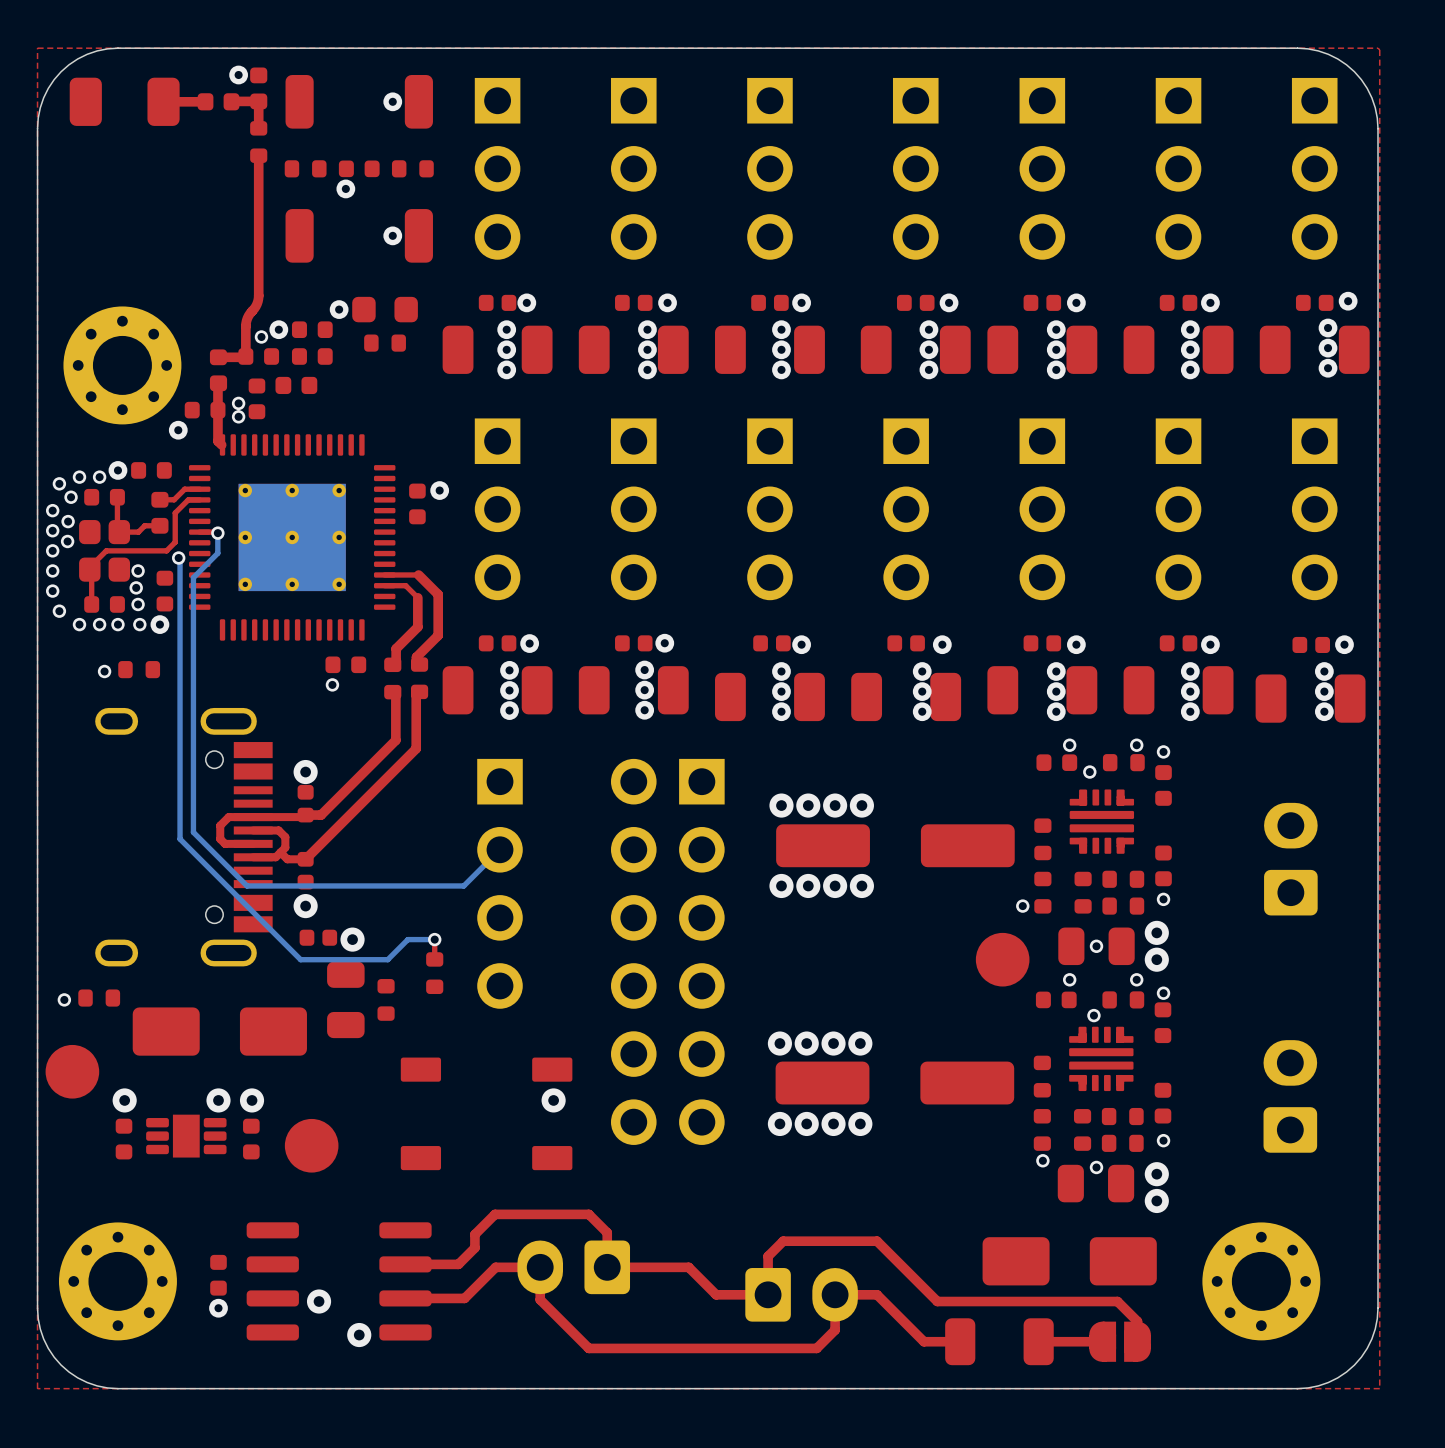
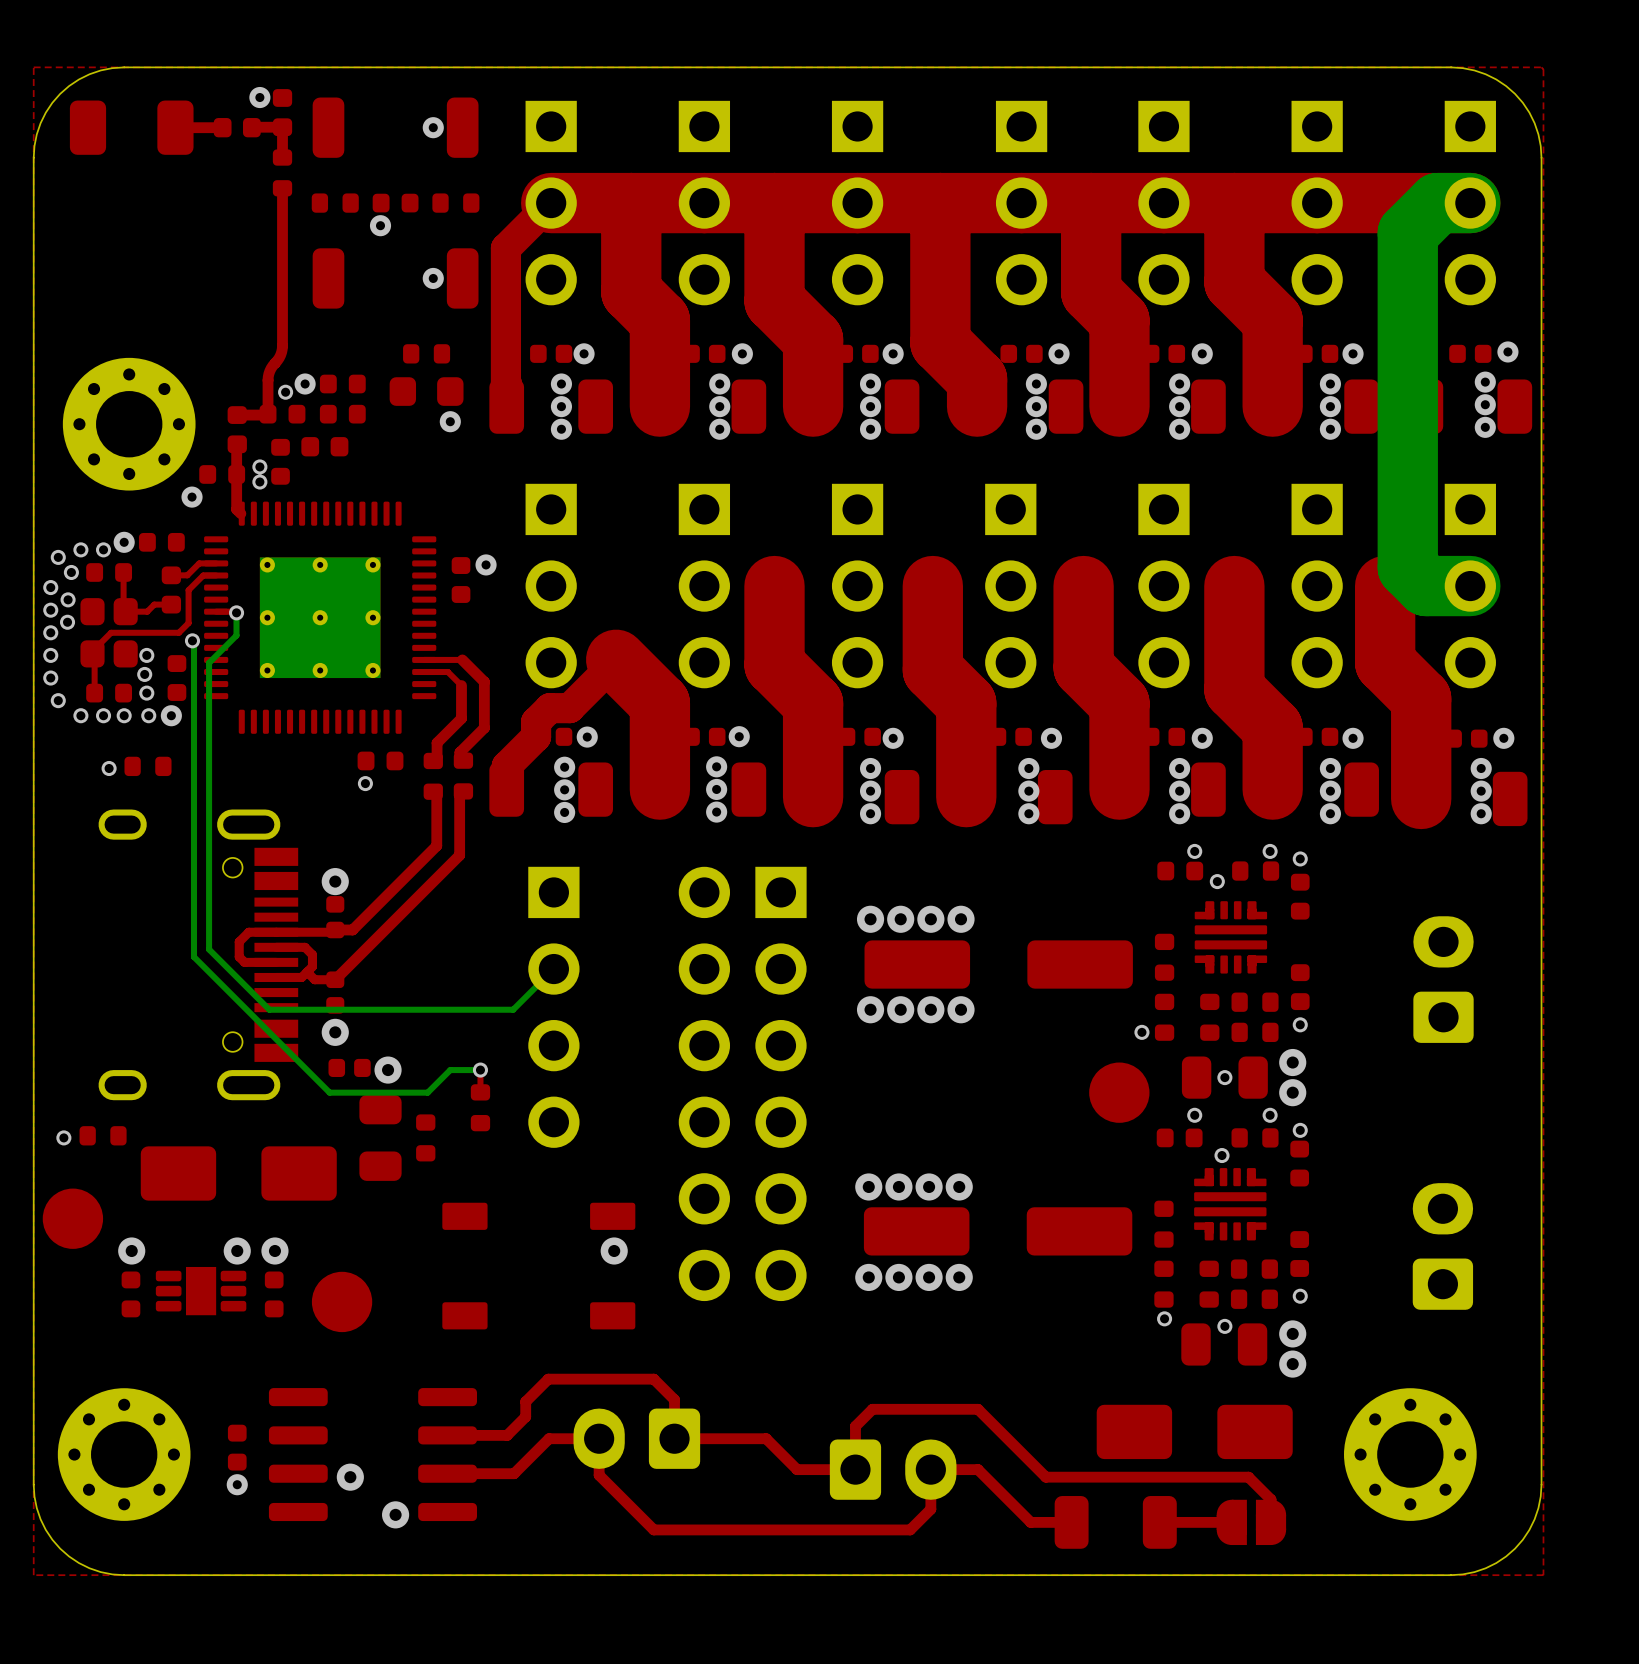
top track: none -> (631, 203) (631, 291) (659, 320) (659, 406)
top track: none -> (774, 203) (774, 301) (813, 339) (813, 406)
top track: none -> (940, 203) (940, 342) (977, 379) (977, 406)
top track: none -> (1091, 203) (1091, 292) (1119, 320) (1119, 406)
top track: none -> (1234, 203) (1234, 282) (1272, 320) (1272, 406)
top track: none -> (1470, 203) (551, 203) (505, 248) (506, 406)
bottom track: none -> (1470, 203) (1437, 203) (1407, 233) (1407, 567) (1426, 586) (1470, 586)
part footprint: [352, 296, 418, 323] -> [403, 344, 451, 364]
via position: (339, 309) -> (450, 421)
part footprint: [364, 334, 406, 352] -> [389, 377, 464, 406]
top track: none -> (774, 586) (774, 664) (813, 703) (813, 797)
top track: none -> (932, 586) (932, 670) (966, 703) (966, 797)
top track: none -> (1083, 586) (1083, 667) (1119, 703) (1119, 789)
top track: none -> (1234, 586) (1234, 689) (1272, 727) (1272, 789)
top track: none -> (1385, 586) (1385, 662) (1421, 698) (1421, 798)
top track: none -> (659, 789) (659, 703) (616, 659) (569, 708) (549, 708) (536, 721) (536, 736) (506, 766) (506, 789)

